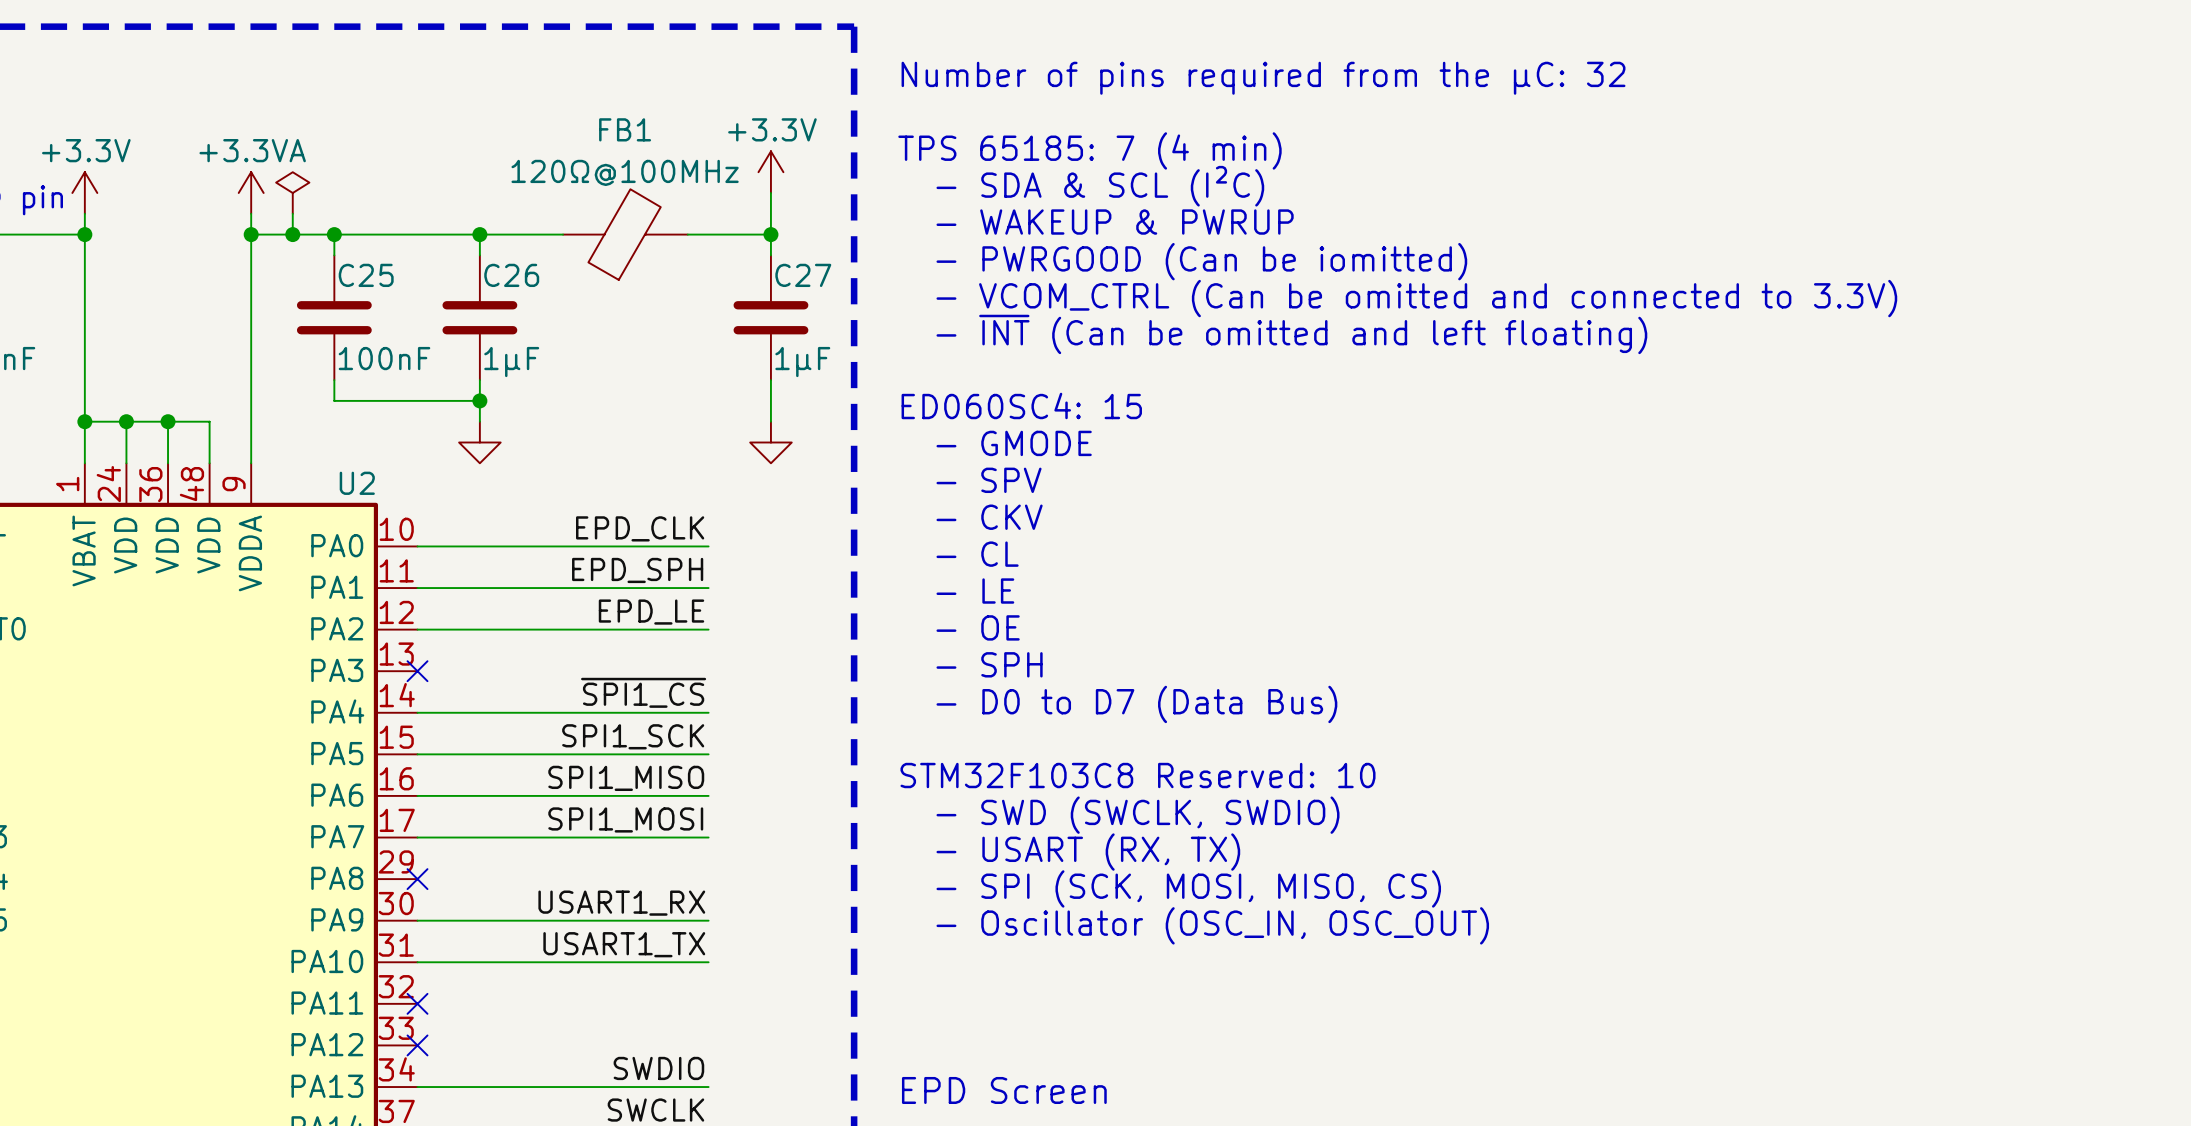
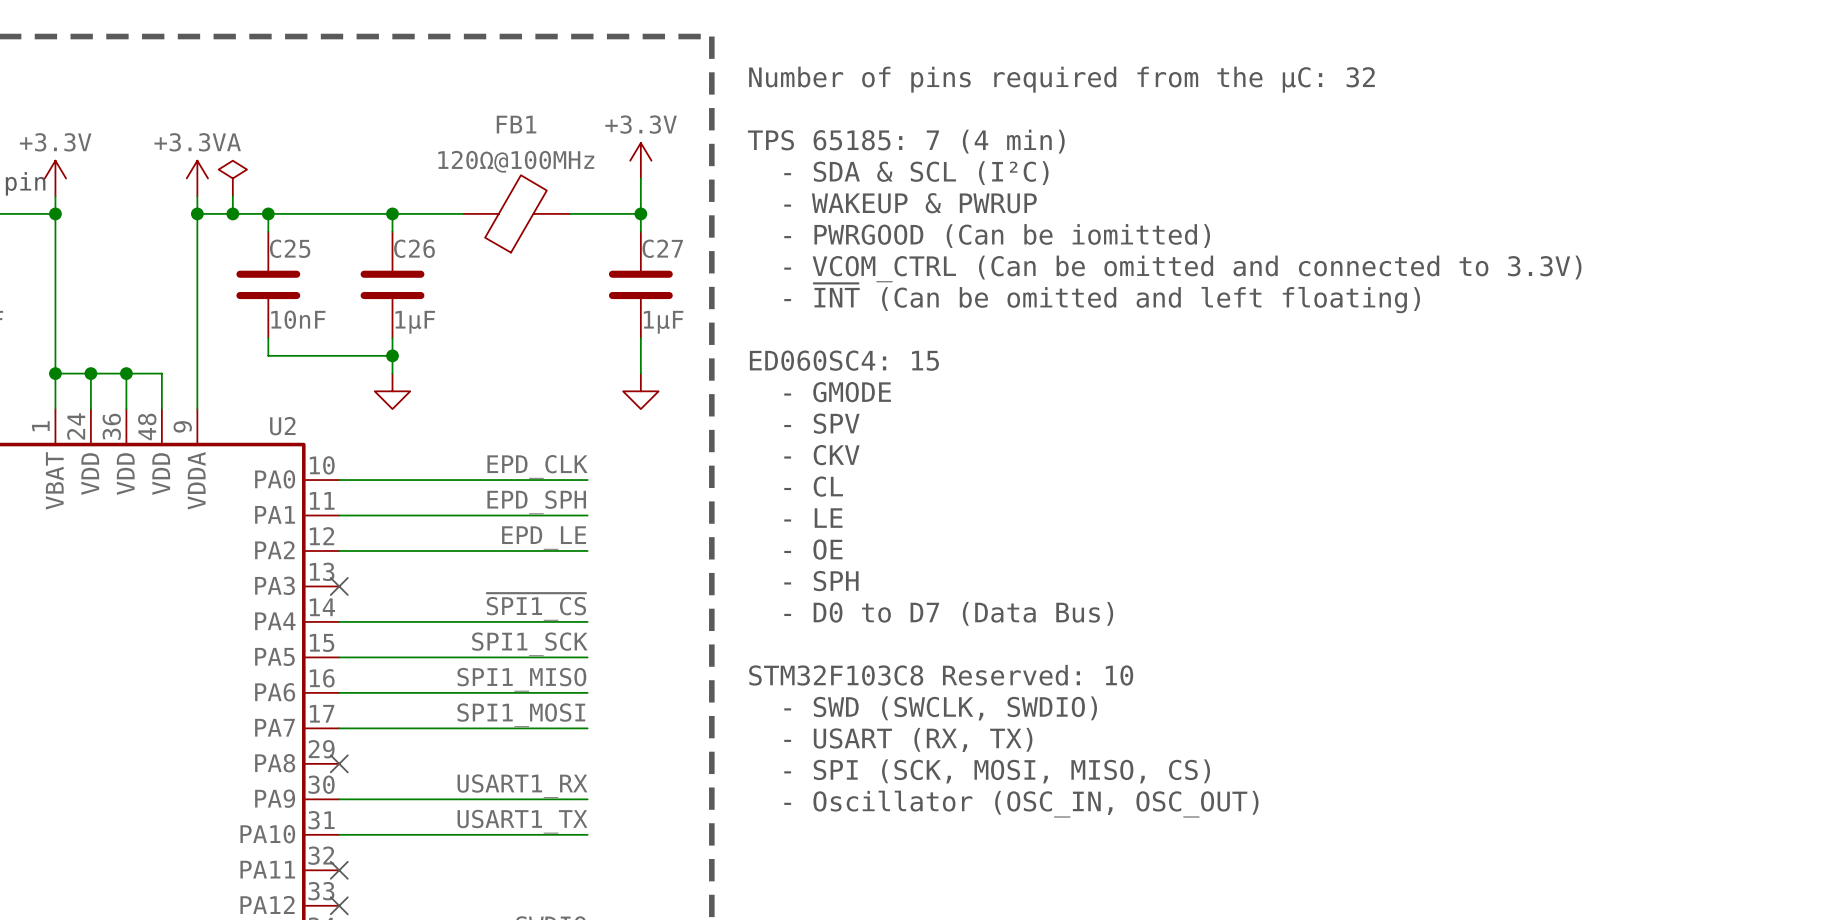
C25 value: 100nF (384, 358) -> 10nF (298, 319)

